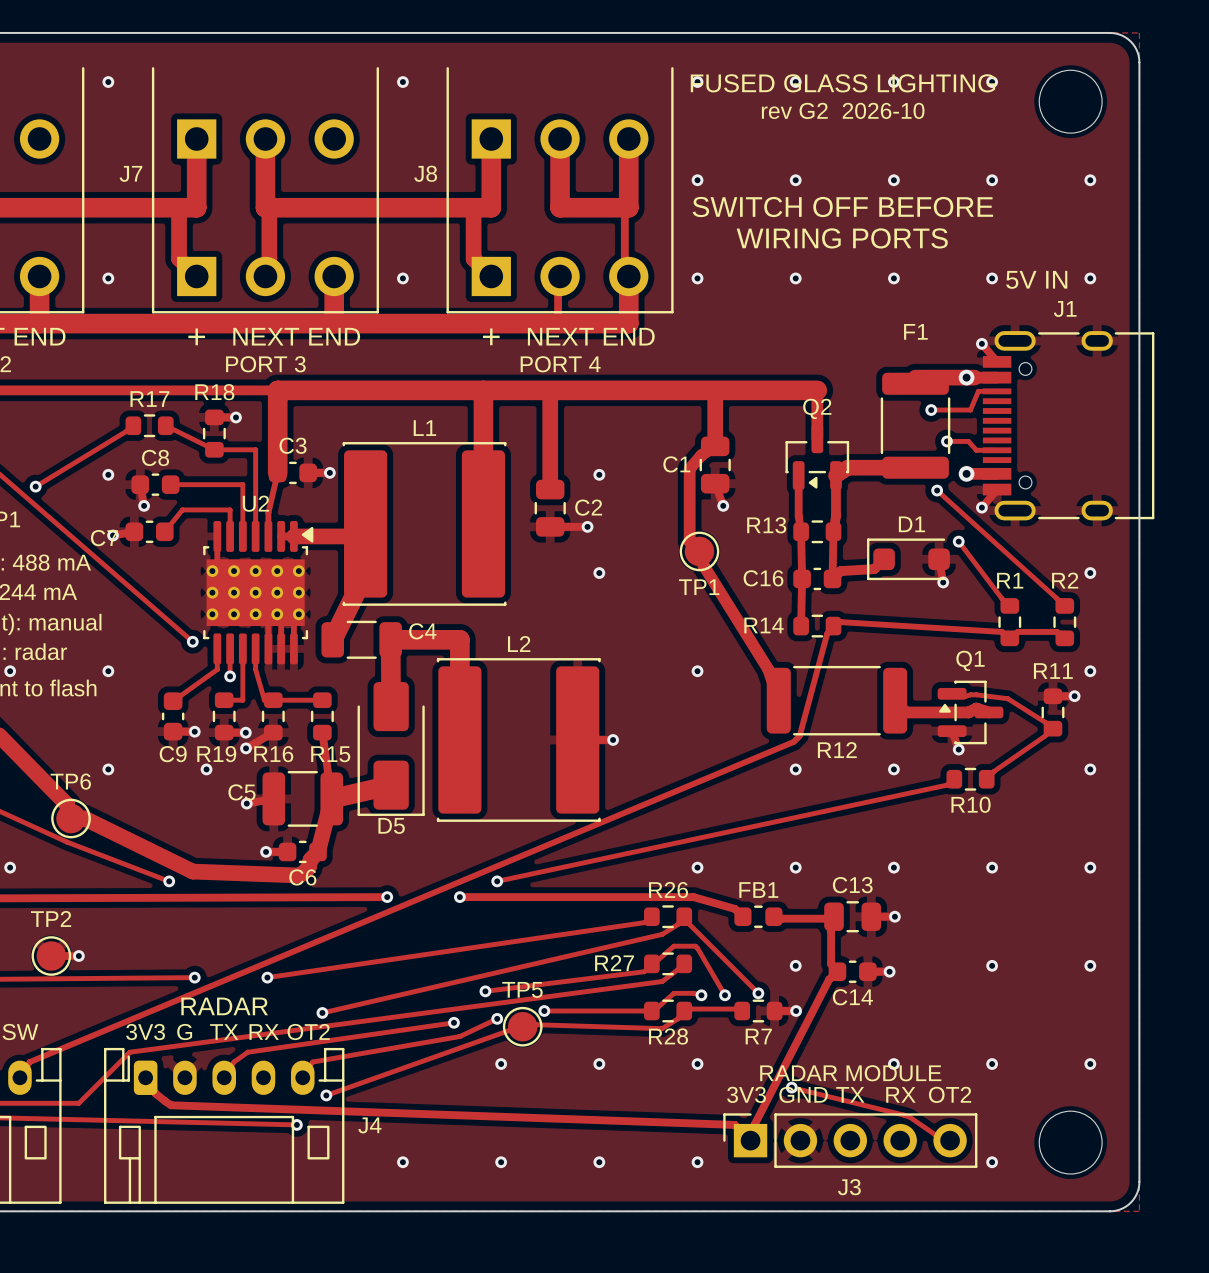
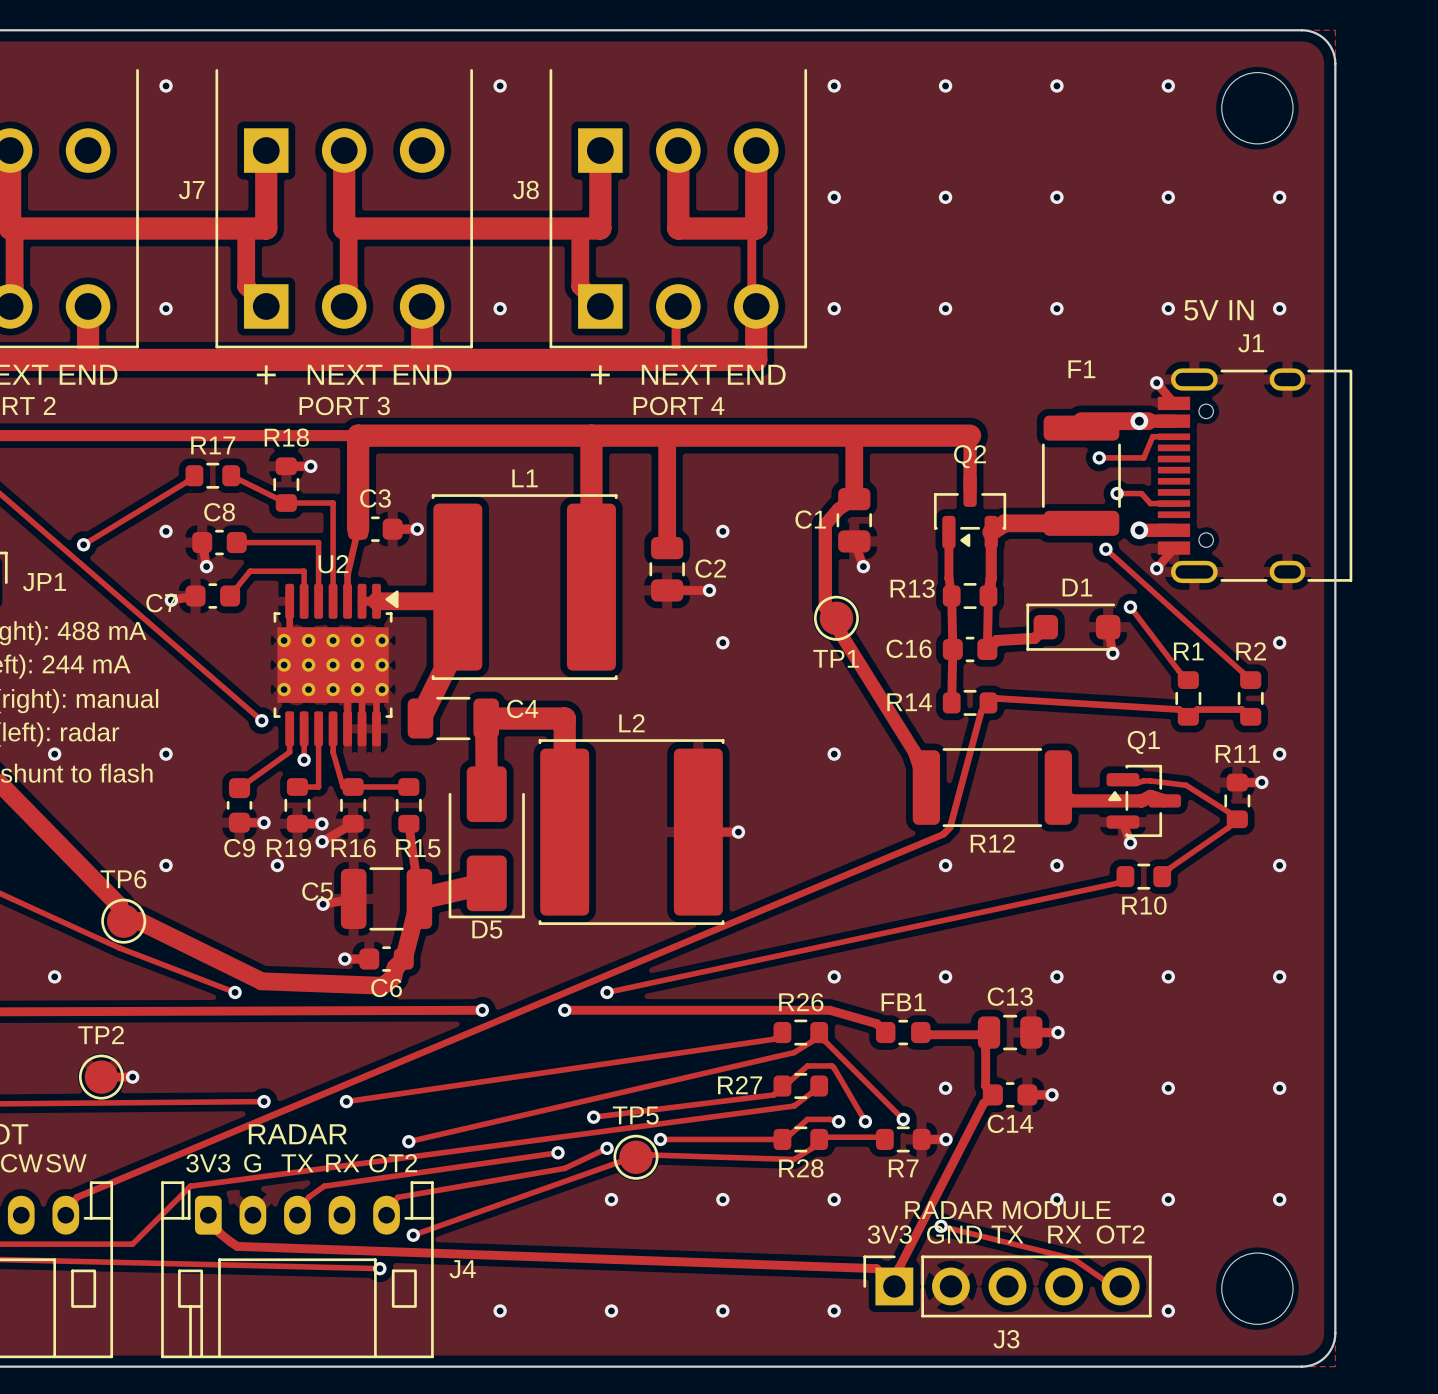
text: FUSED GLASS LIGHTING (842, 83) -> none
text: rev G2 2026-10 (843, 110) -> none
text: SWITCH OFF BEFORE (842, 206) -> none
text: WIRING PORTS (842, 238) -> none

